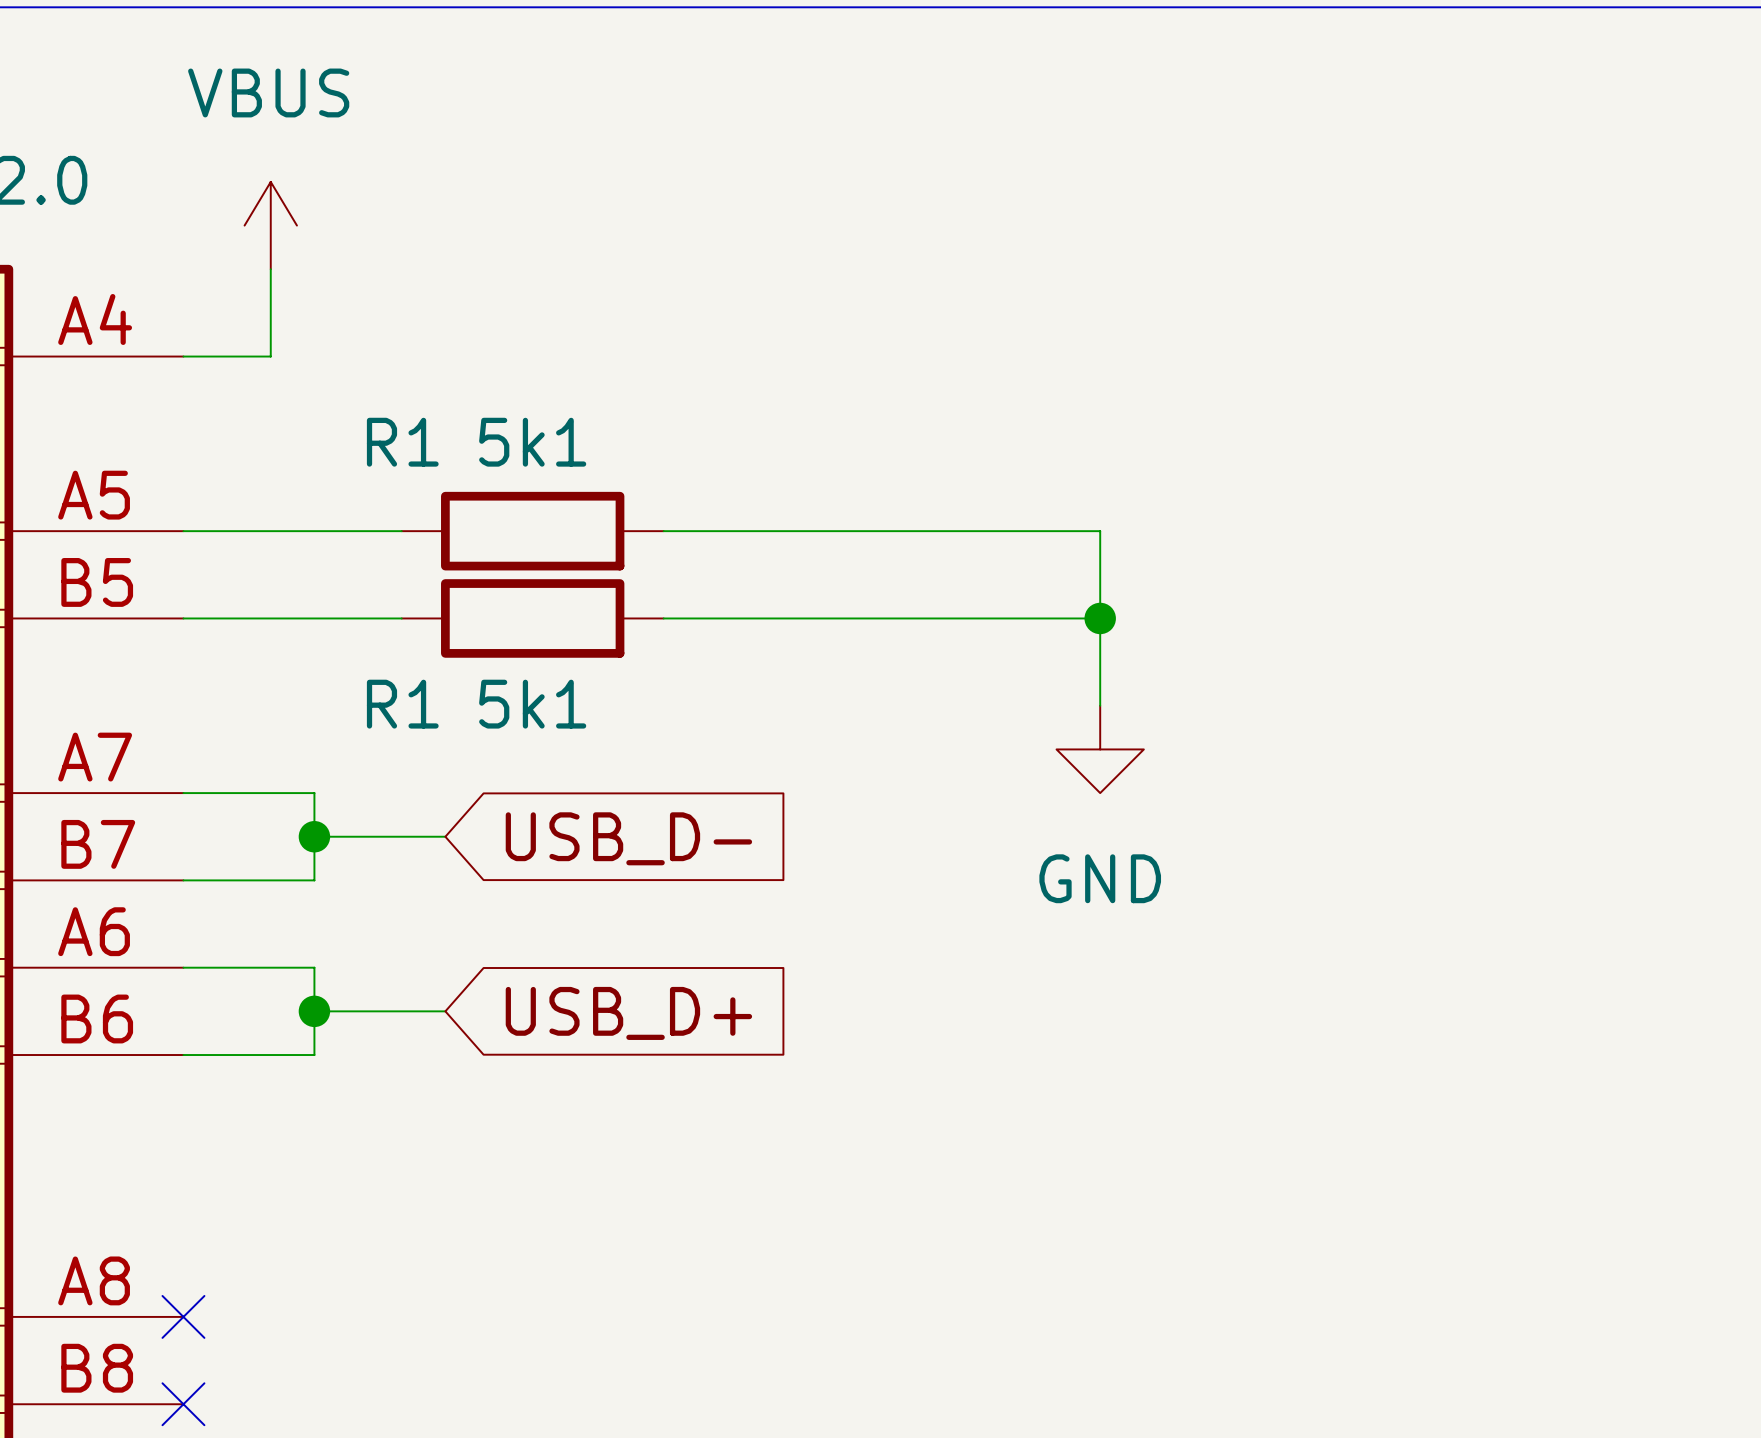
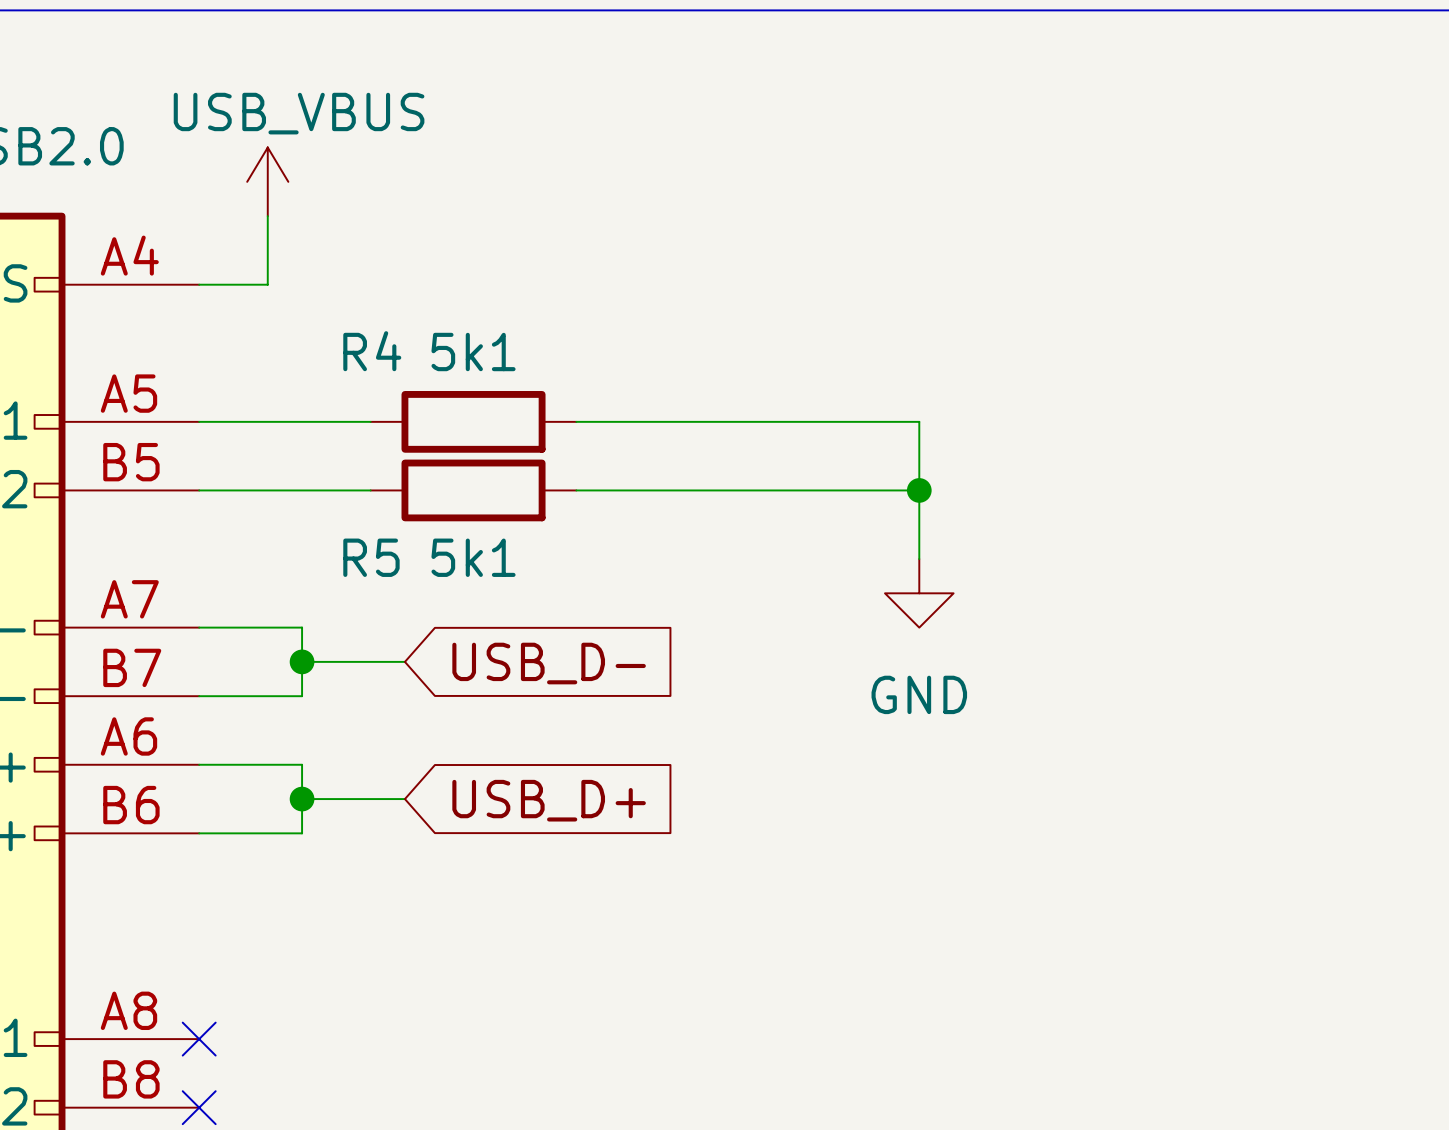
power symbol: VBUS (270, 225) -> USB_VBUS (267, 181)
R1 name: R1 (402, 442) -> R4 (372, 351)
R1 name: R1 (402, 704) -> R5 (371, 557)

